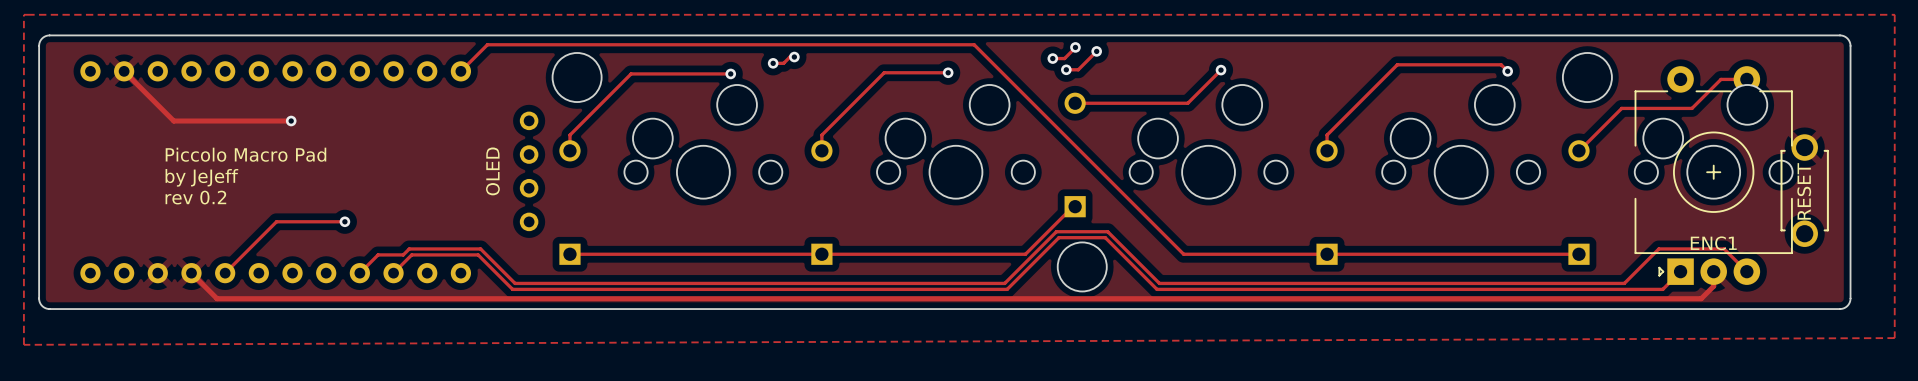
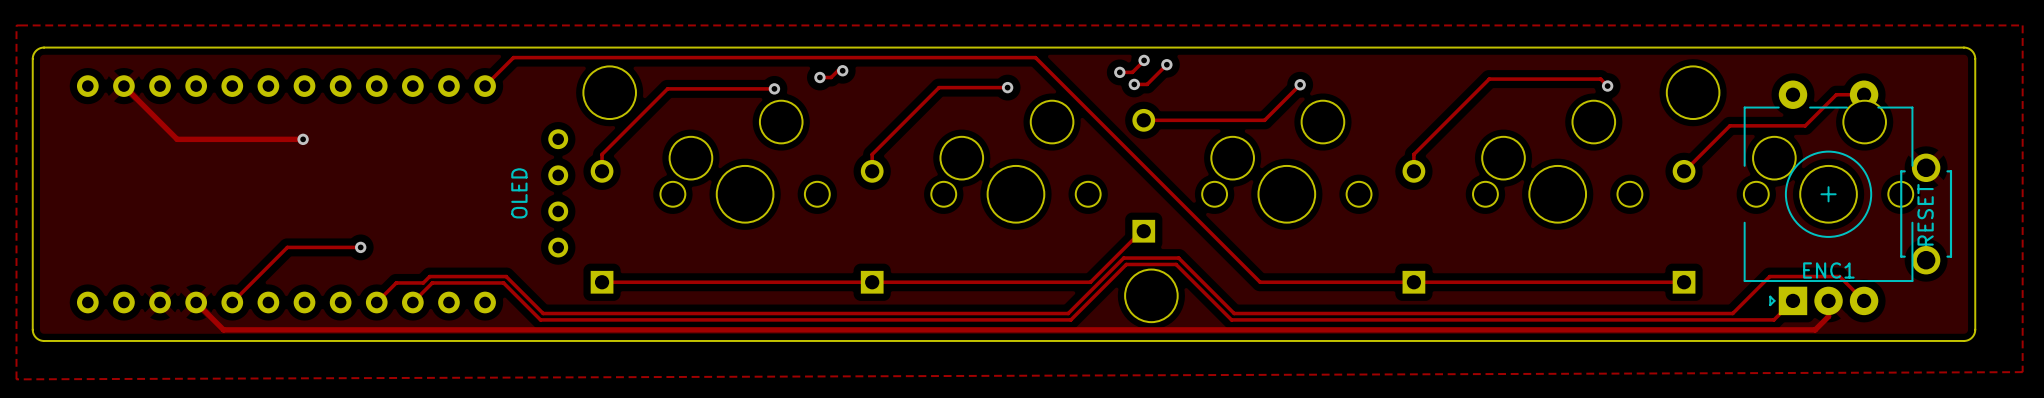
text: Piccolo Macro Pad (245, 154) -> none
text: by JeJeff (201, 177) -> none
text: rev 0.2 (195, 197) -> none

